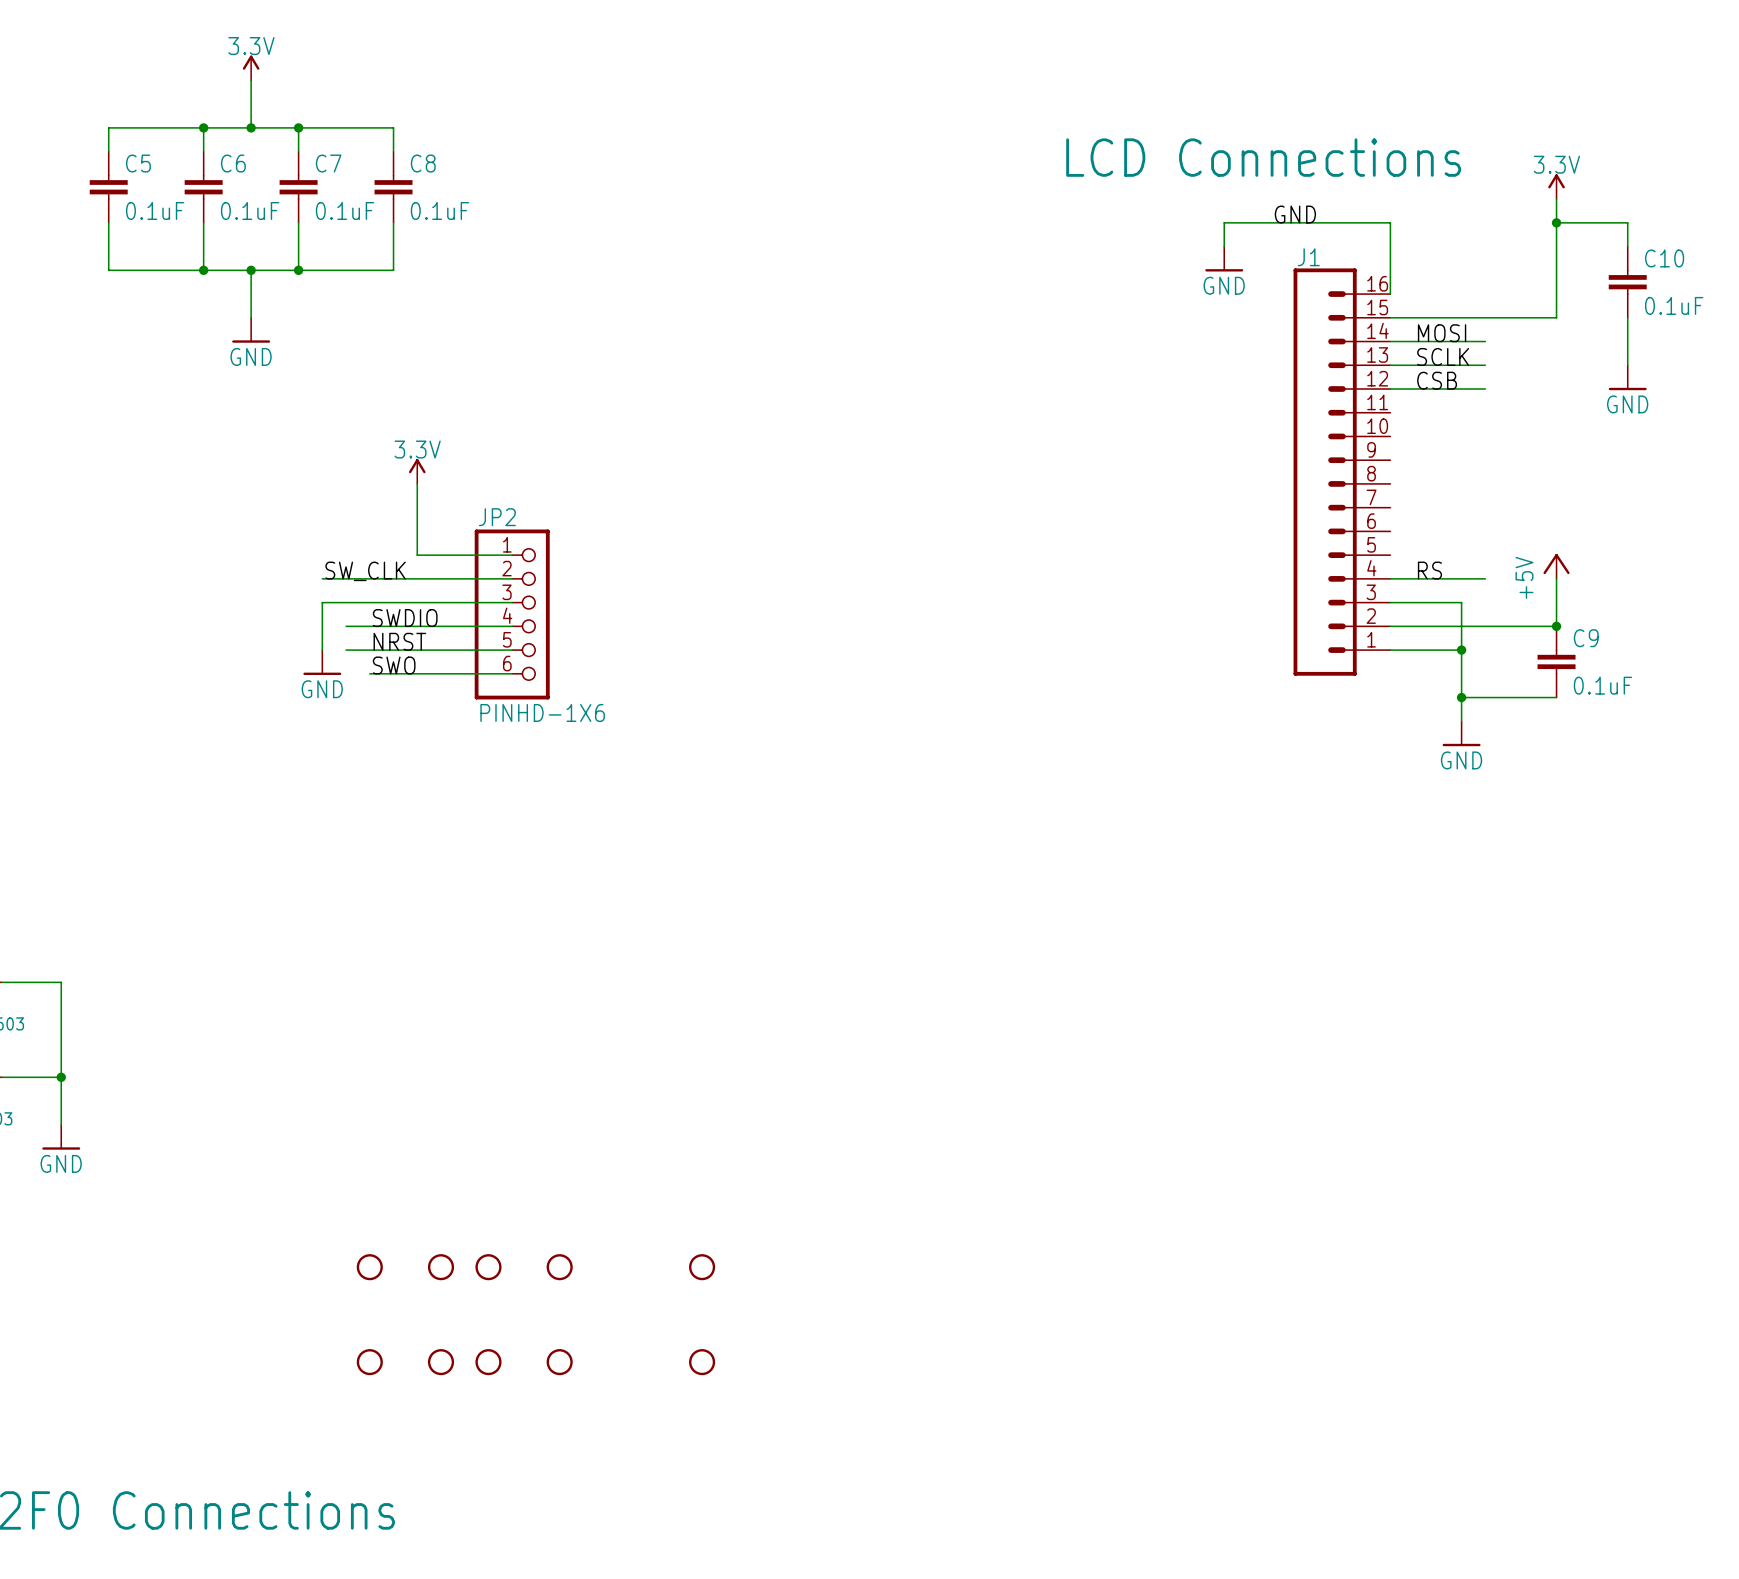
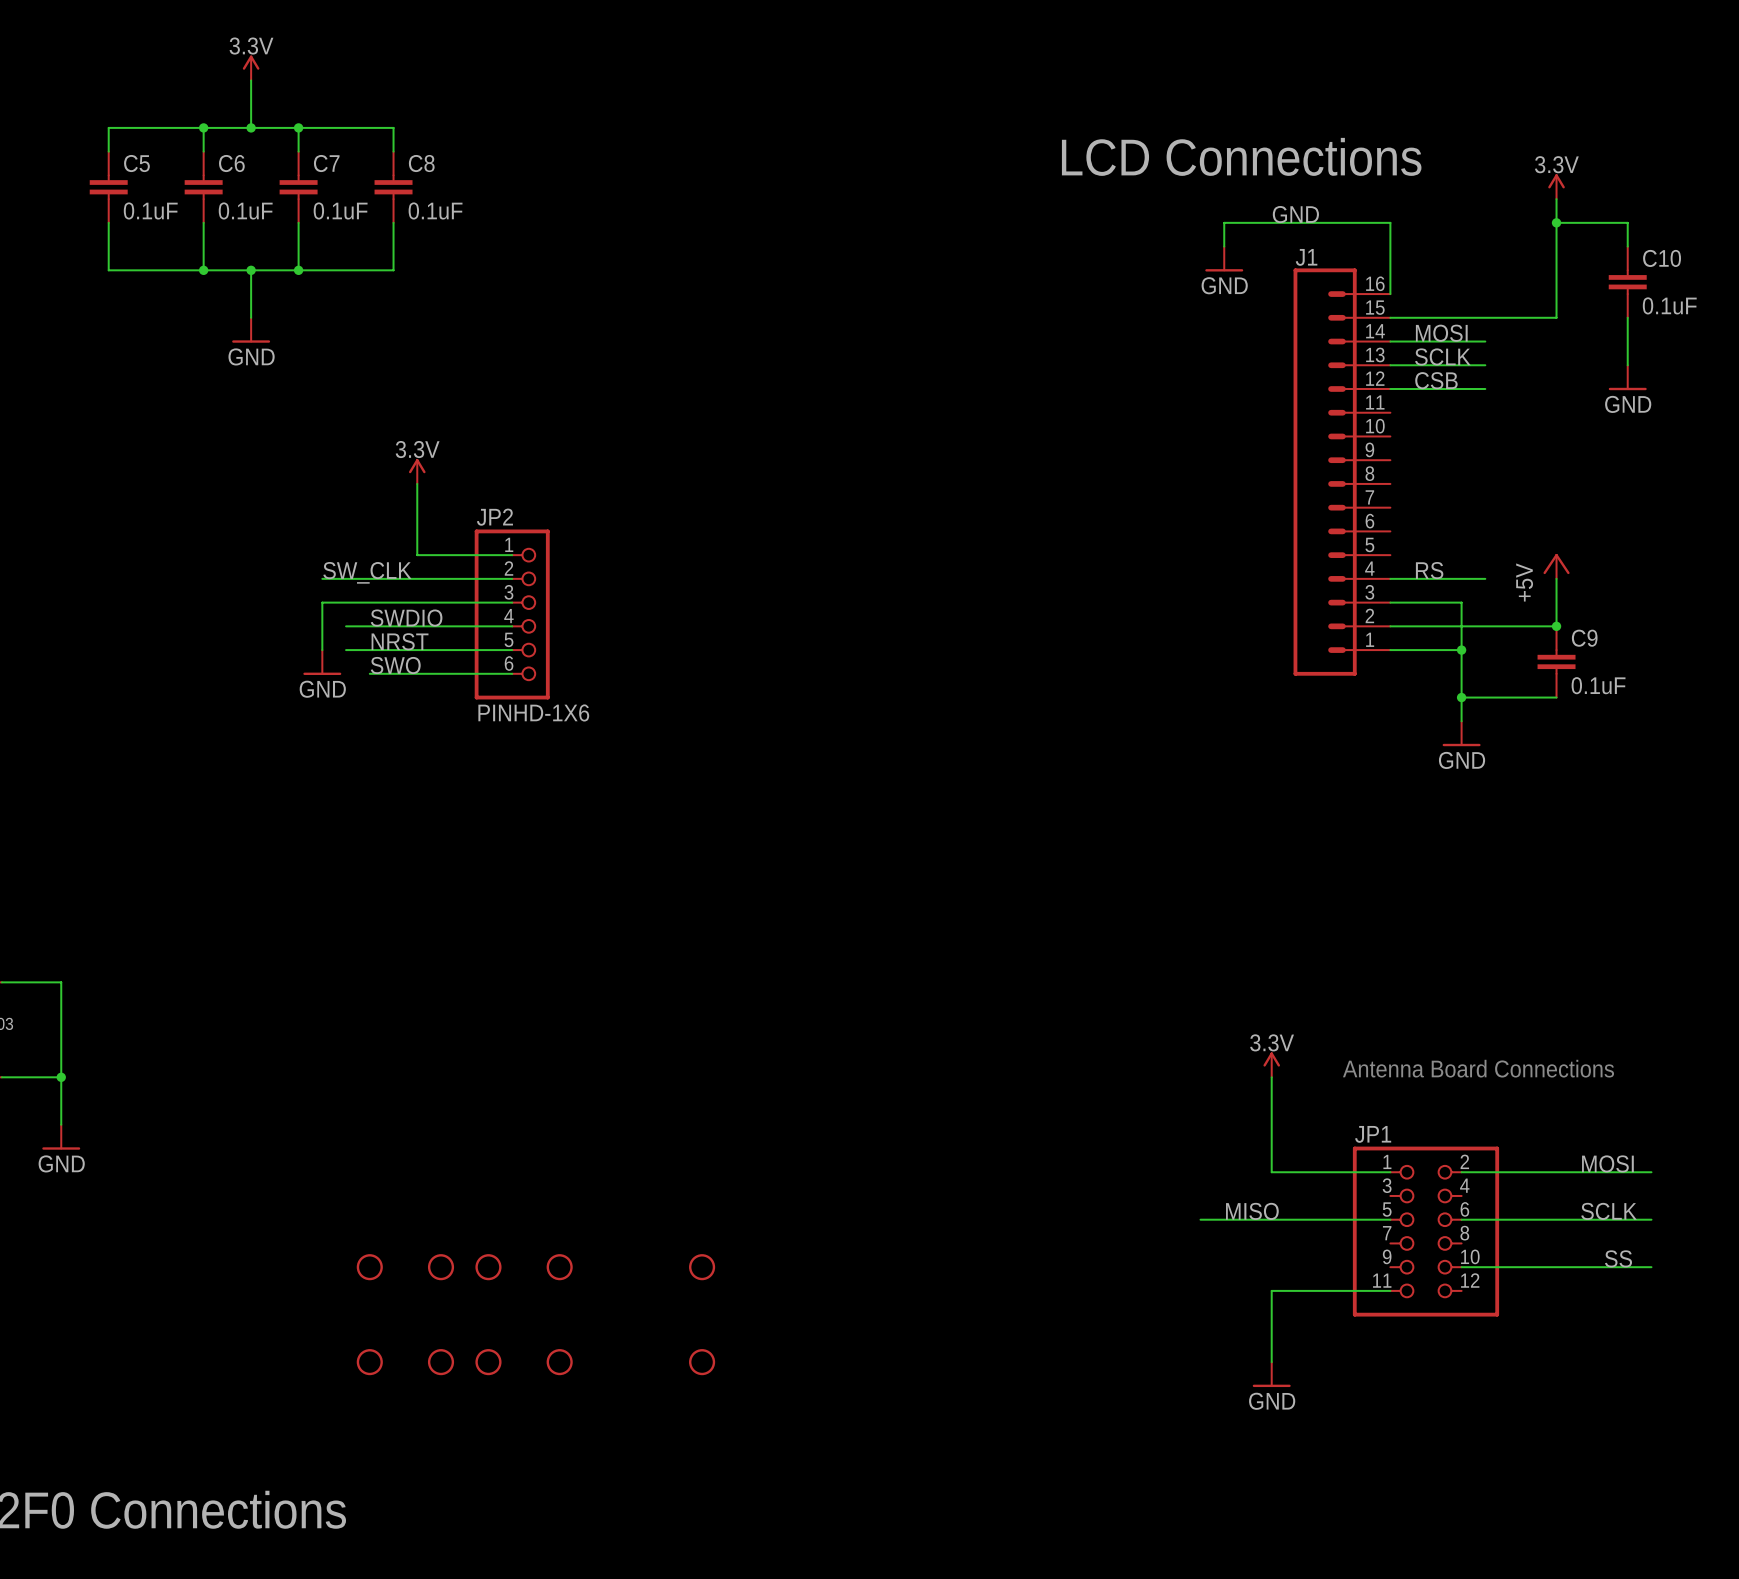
power symbol: none -> 3.3V (1271, 1064)
text: none -> Antenna Board Connections (1478, 1068)
wire: none -> (1271, 1077) (1271, 1172) (1390, 1172)
label: none -> MOSI (1607, 1163)
wire: none -> (1461, 1172) (1651, 1172)
label: none -> MISO (1252, 1211)
label: none -> SCLK (1609, 1211)
wire: none -> (1200, 1219) (1390, 1219)
wire: none -> (1461, 1219) (1651, 1219)
JP1: none -> (1425, 1231)
label: none -> SS (1618, 1258)
wire: none -> (1461, 1267) (1651, 1267)
wire: none -> (1390, 1290) (1271, 1290) (1271, 1362)
power symbol: none -> GND (1271, 1374)

